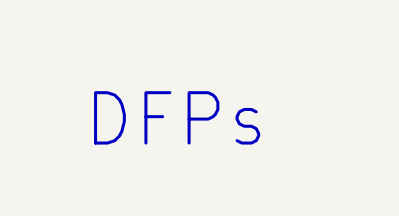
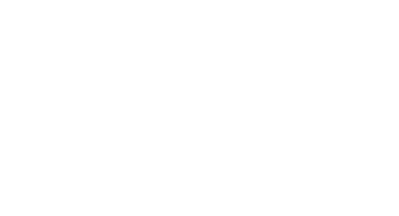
text: DFPs (177, 117) -> none

